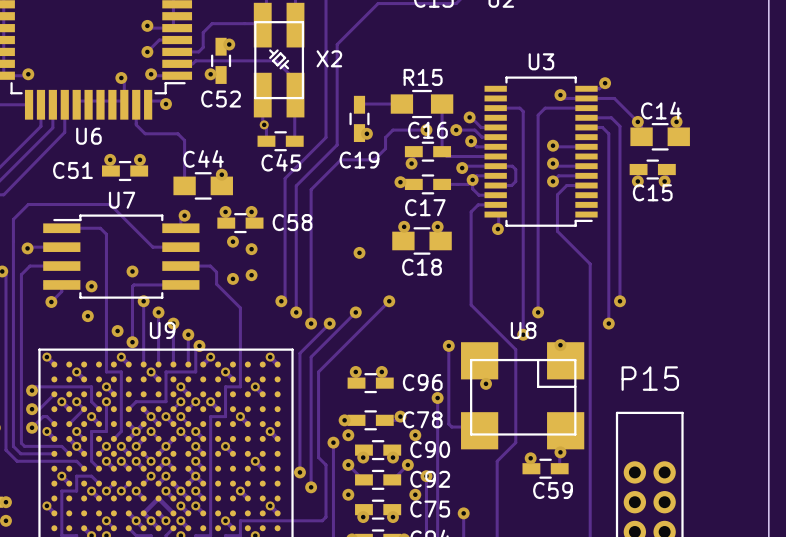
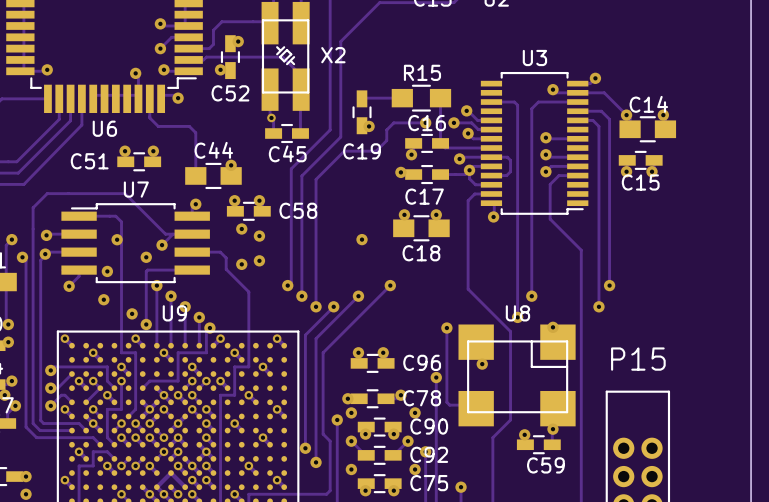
track: none -> (173, 234) (162, 245)
via: none -> (117, 239)
via: none -> (162, 245)
via: none -> (45, 254)

